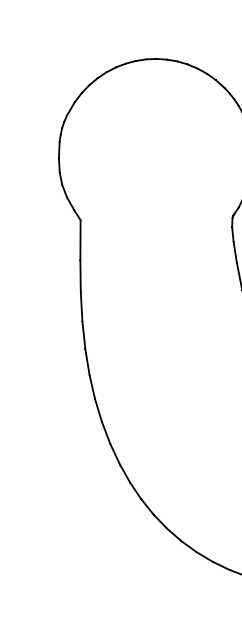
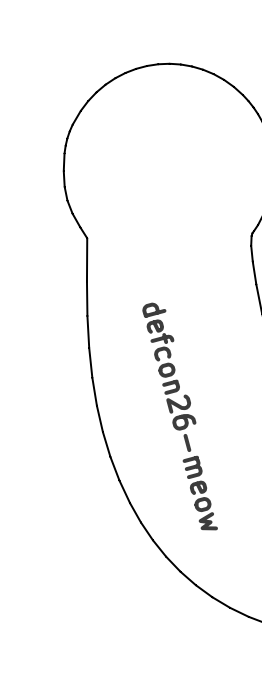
text: none -> defcon26-meow (180, 416)

